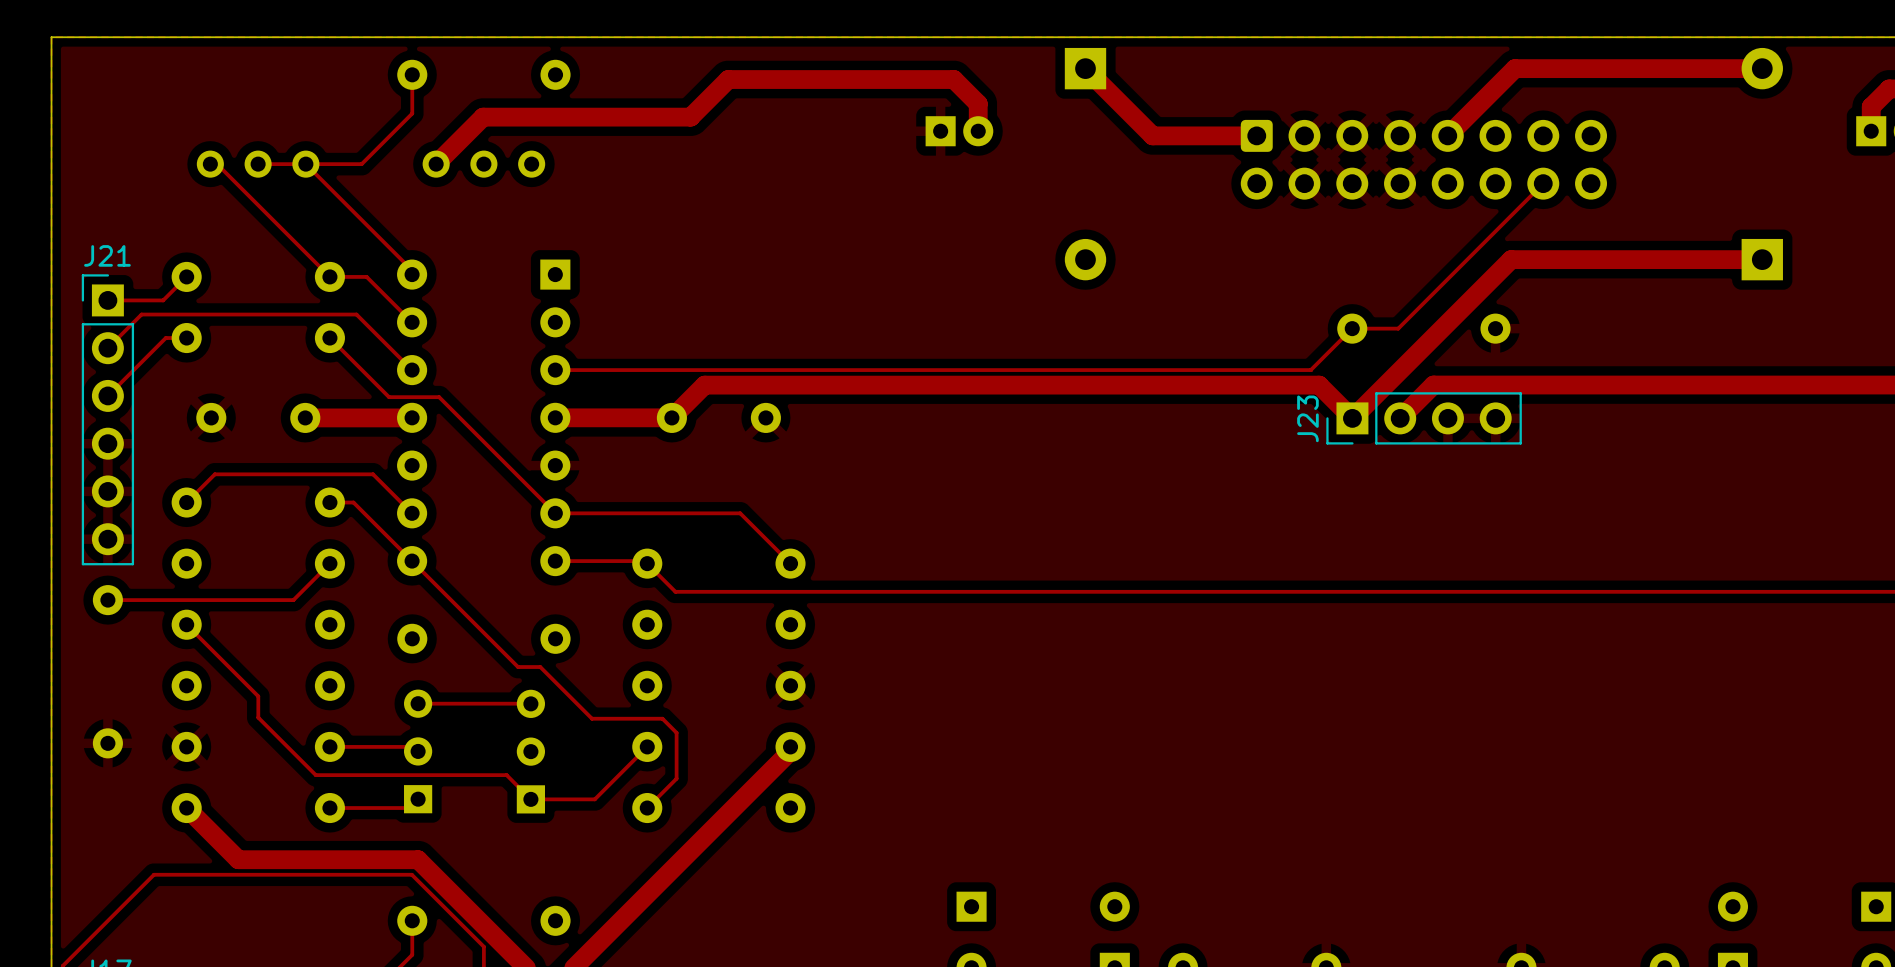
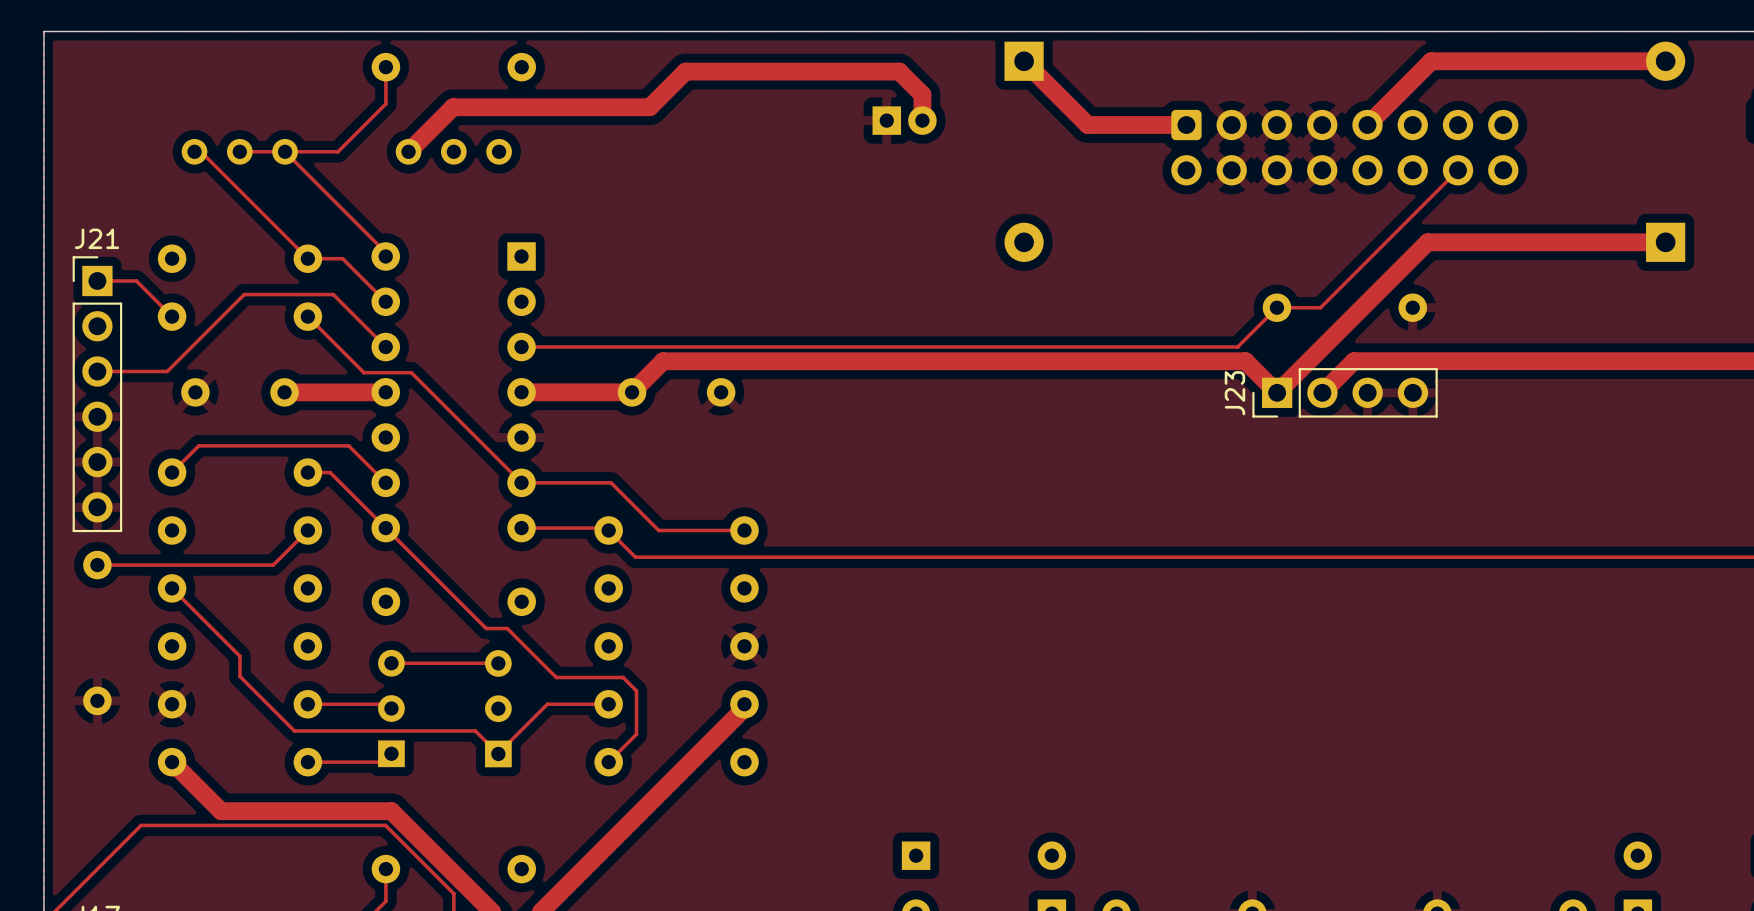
track: (186, 276) (163, 300) (149, 300) -> (172, 316) (136, 280)
track: (356, 314) (141, 314) (107, 348) -> (333, 294) (244, 294) (167, 371) (97, 371)
track: (186, 338) (165, 338) (107, 395) -> none
track: (649, 513) (740, 513) (790, 563) -> (611, 482) (658, 530) (744, 530)
track: (647, 746) (594, 799) (530, 799) -> (608, 704) (547, 704) (498, 753)

